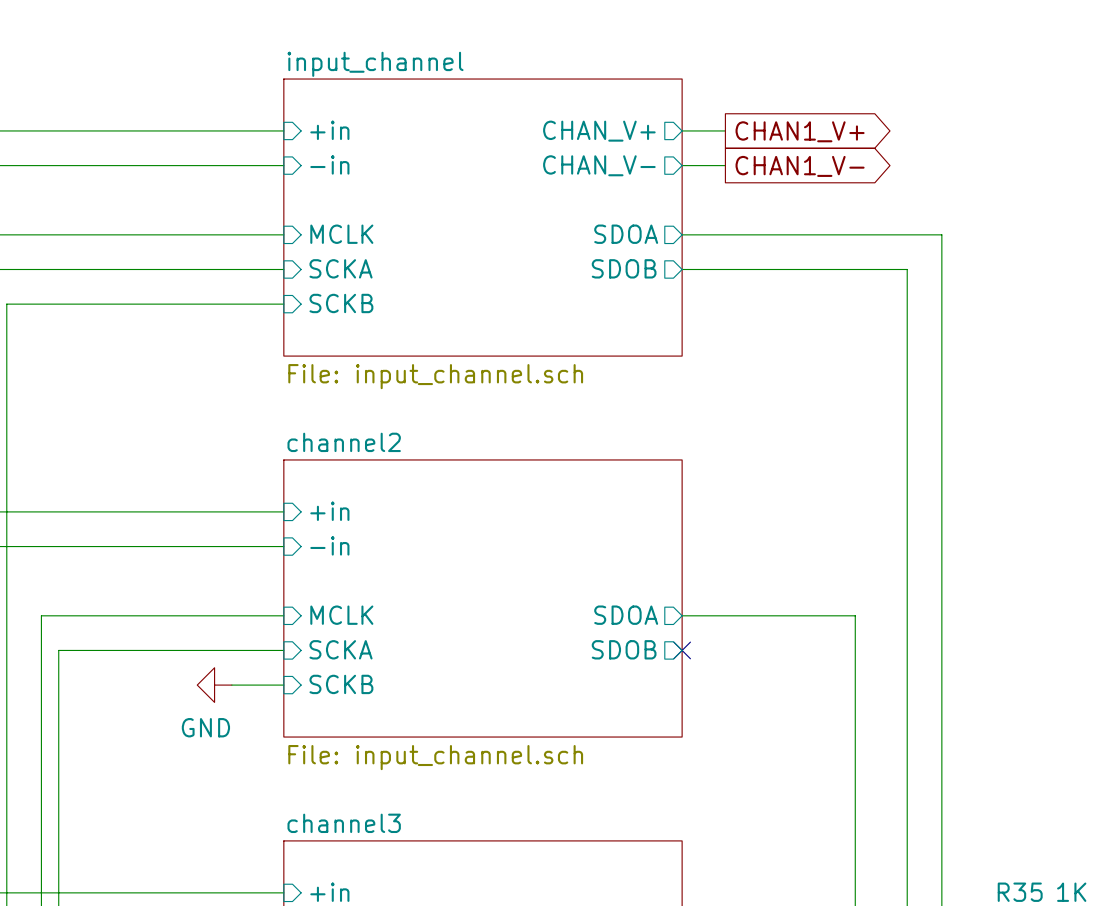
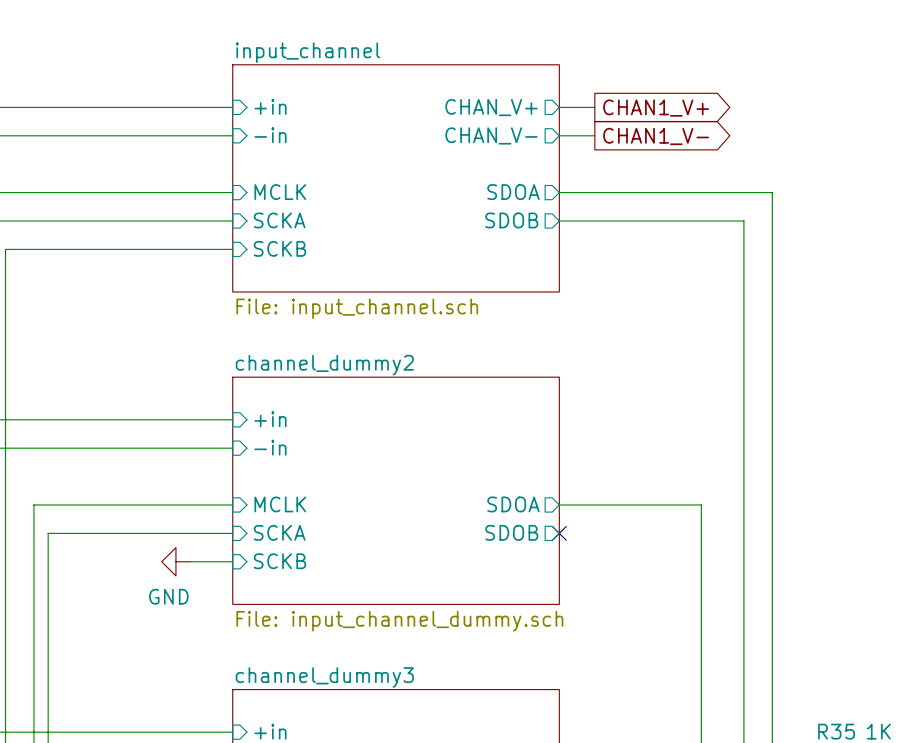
sheet channel2 name: channel2 (344, 442) -> channel_dummy2 (324, 365)
sheet channel2 value: File: input_channel.sch (435, 757) -> File: input_channel_dummy.sch (399, 621)
sheet channel3 name: channel3 (344, 823) -> channel_dummy3 (324, 677)

